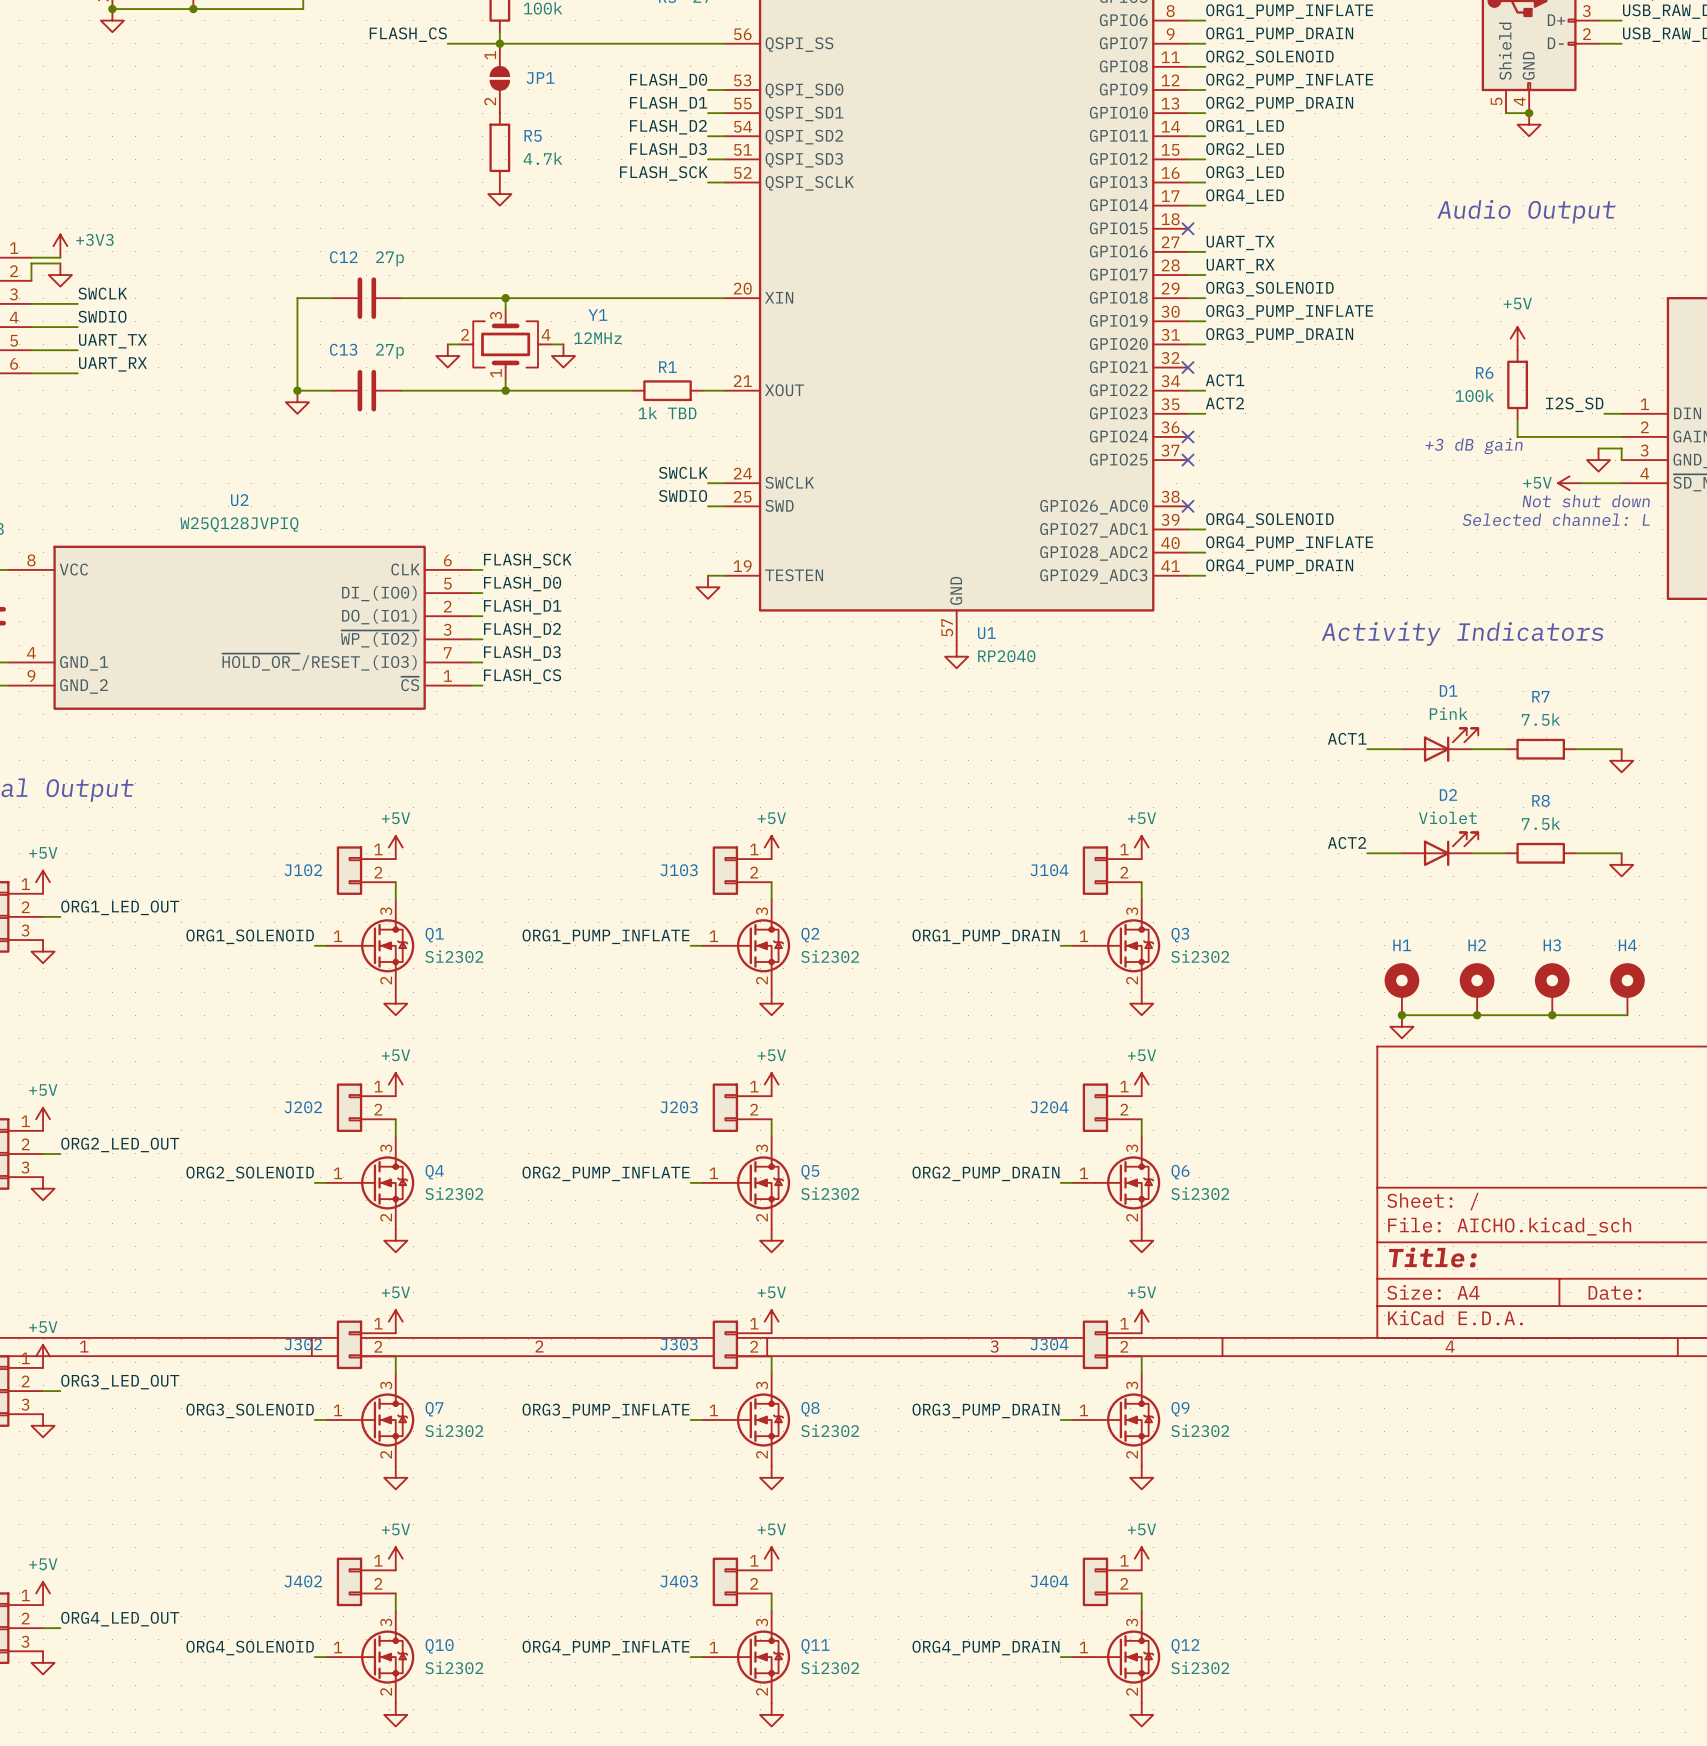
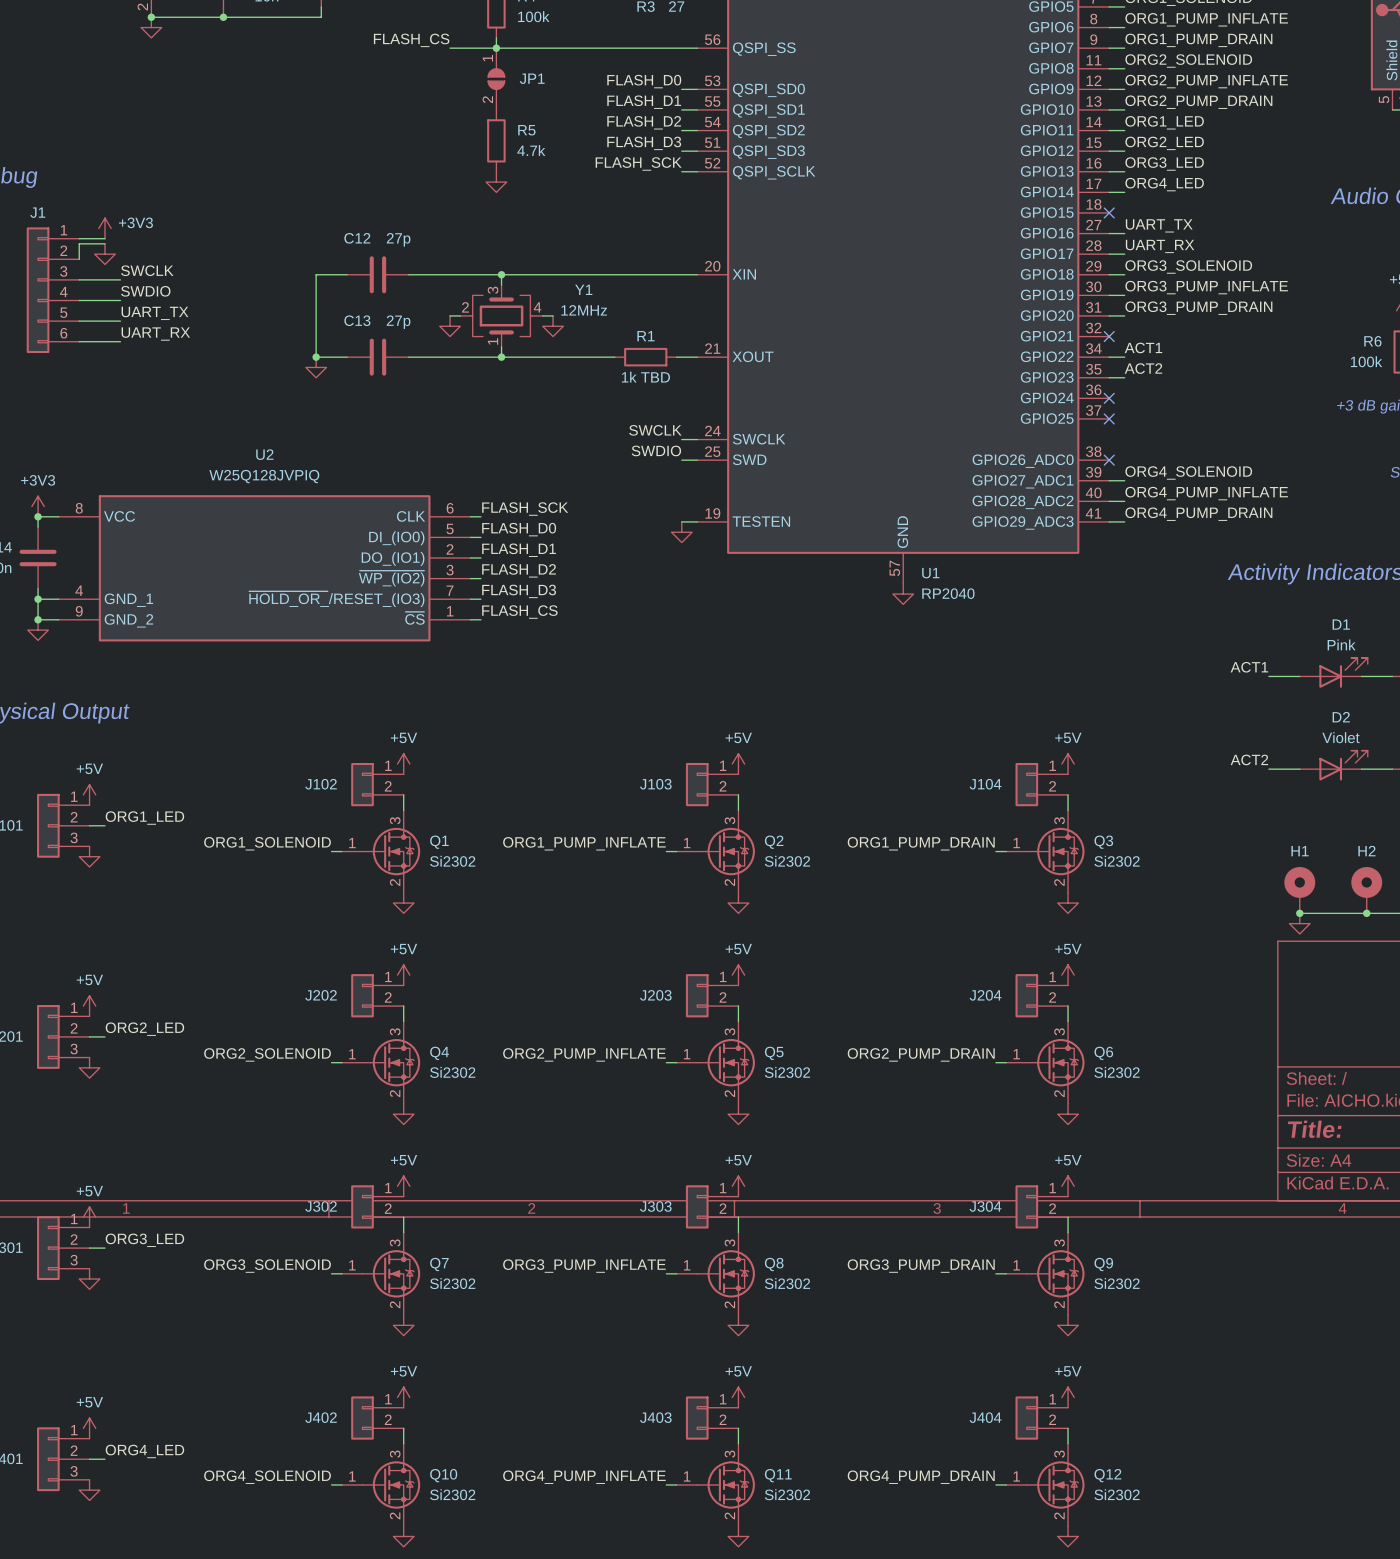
label: ORG1_LED_OUT (120, 907) -> ORG1_LED (144, 818)
label: ORG2_LED_OUT (120, 1144) -> ORG2_LED (144, 1029)
label: ORG3_LED_OUT (120, 1382) -> ORG3_LED (144, 1240)
label: ORG4_LED_OUT (120, 1619) -> ORG4_LED (144, 1451)

